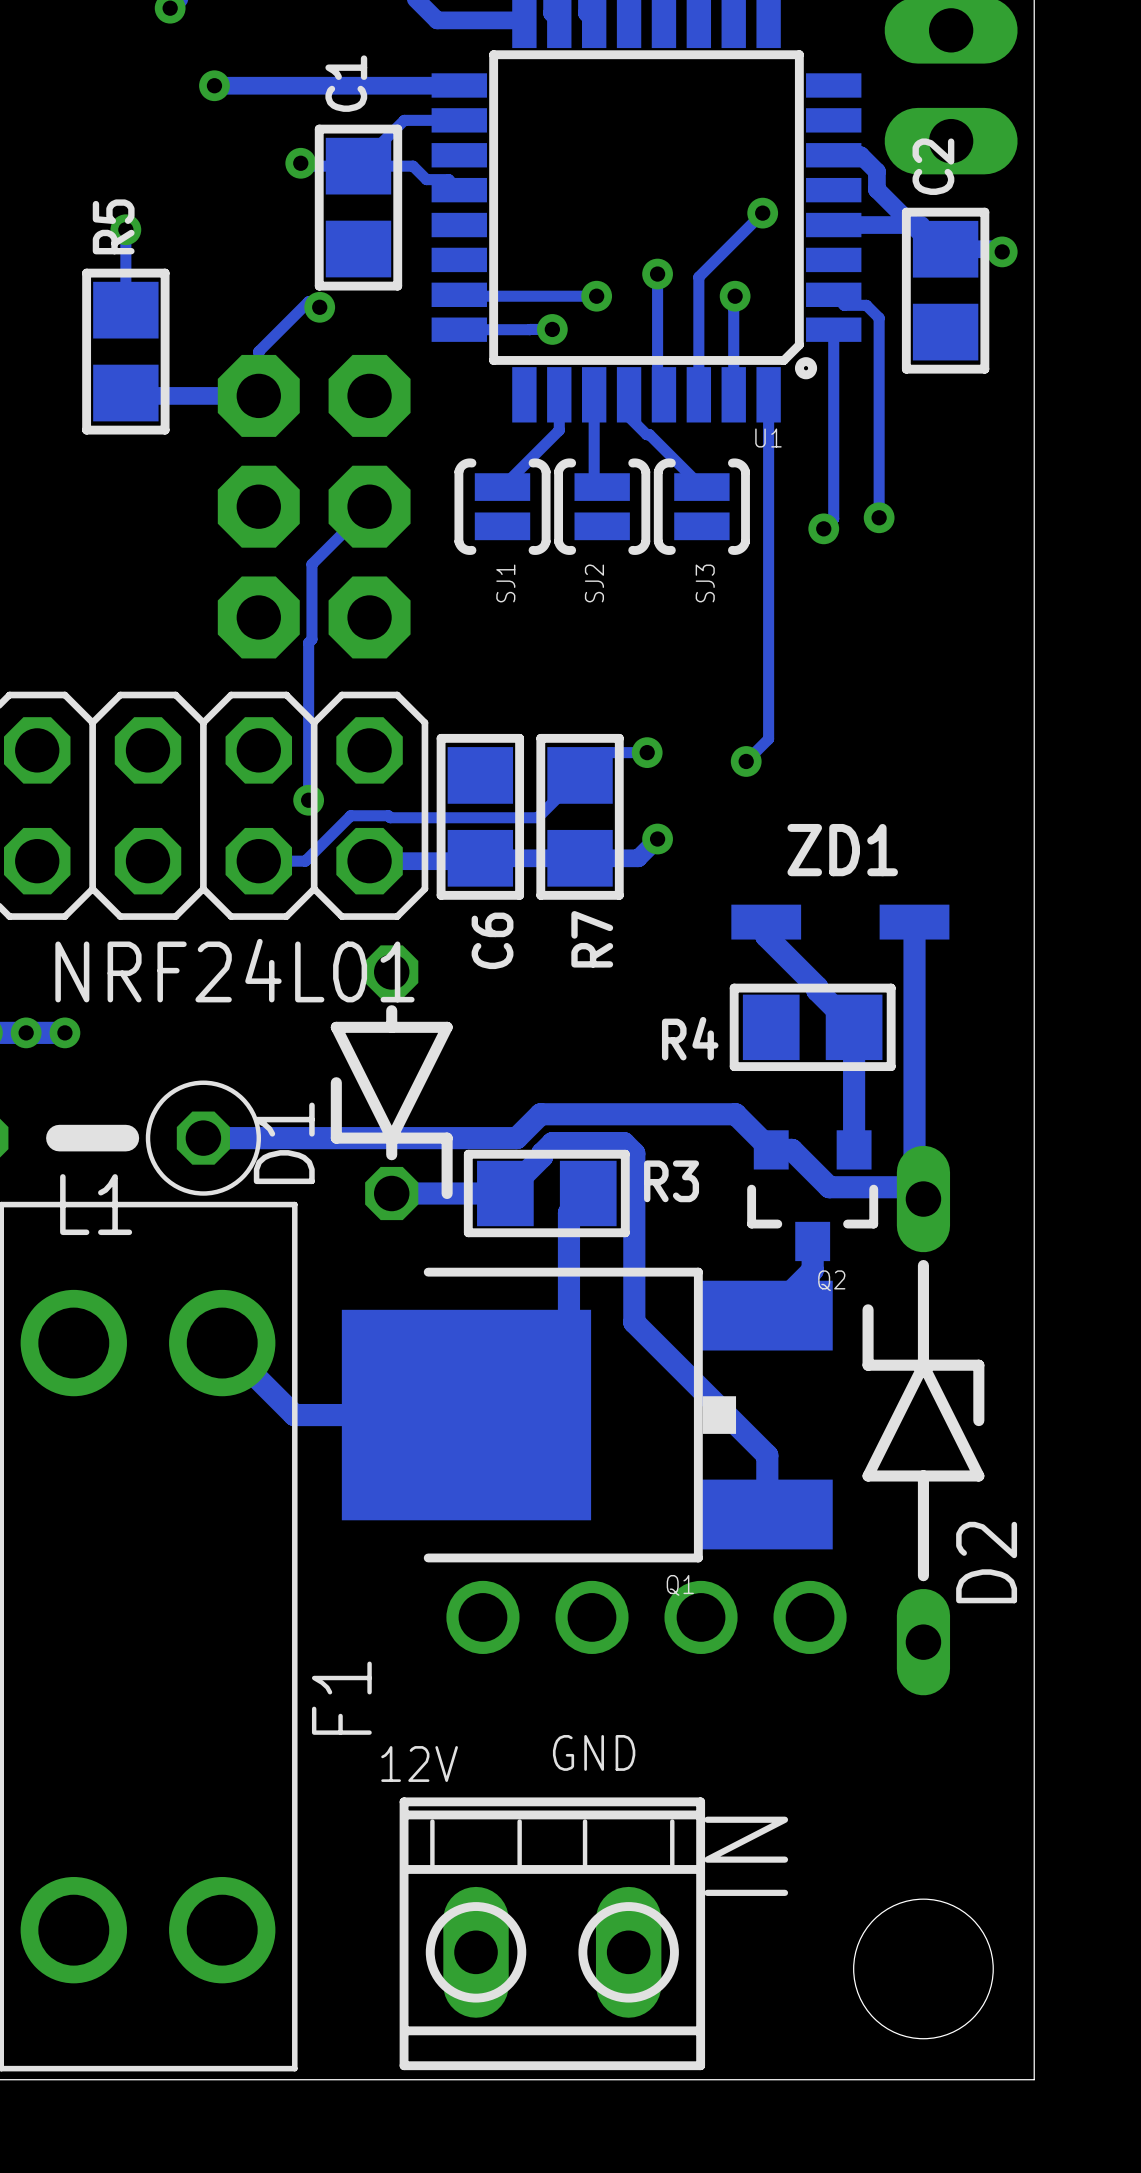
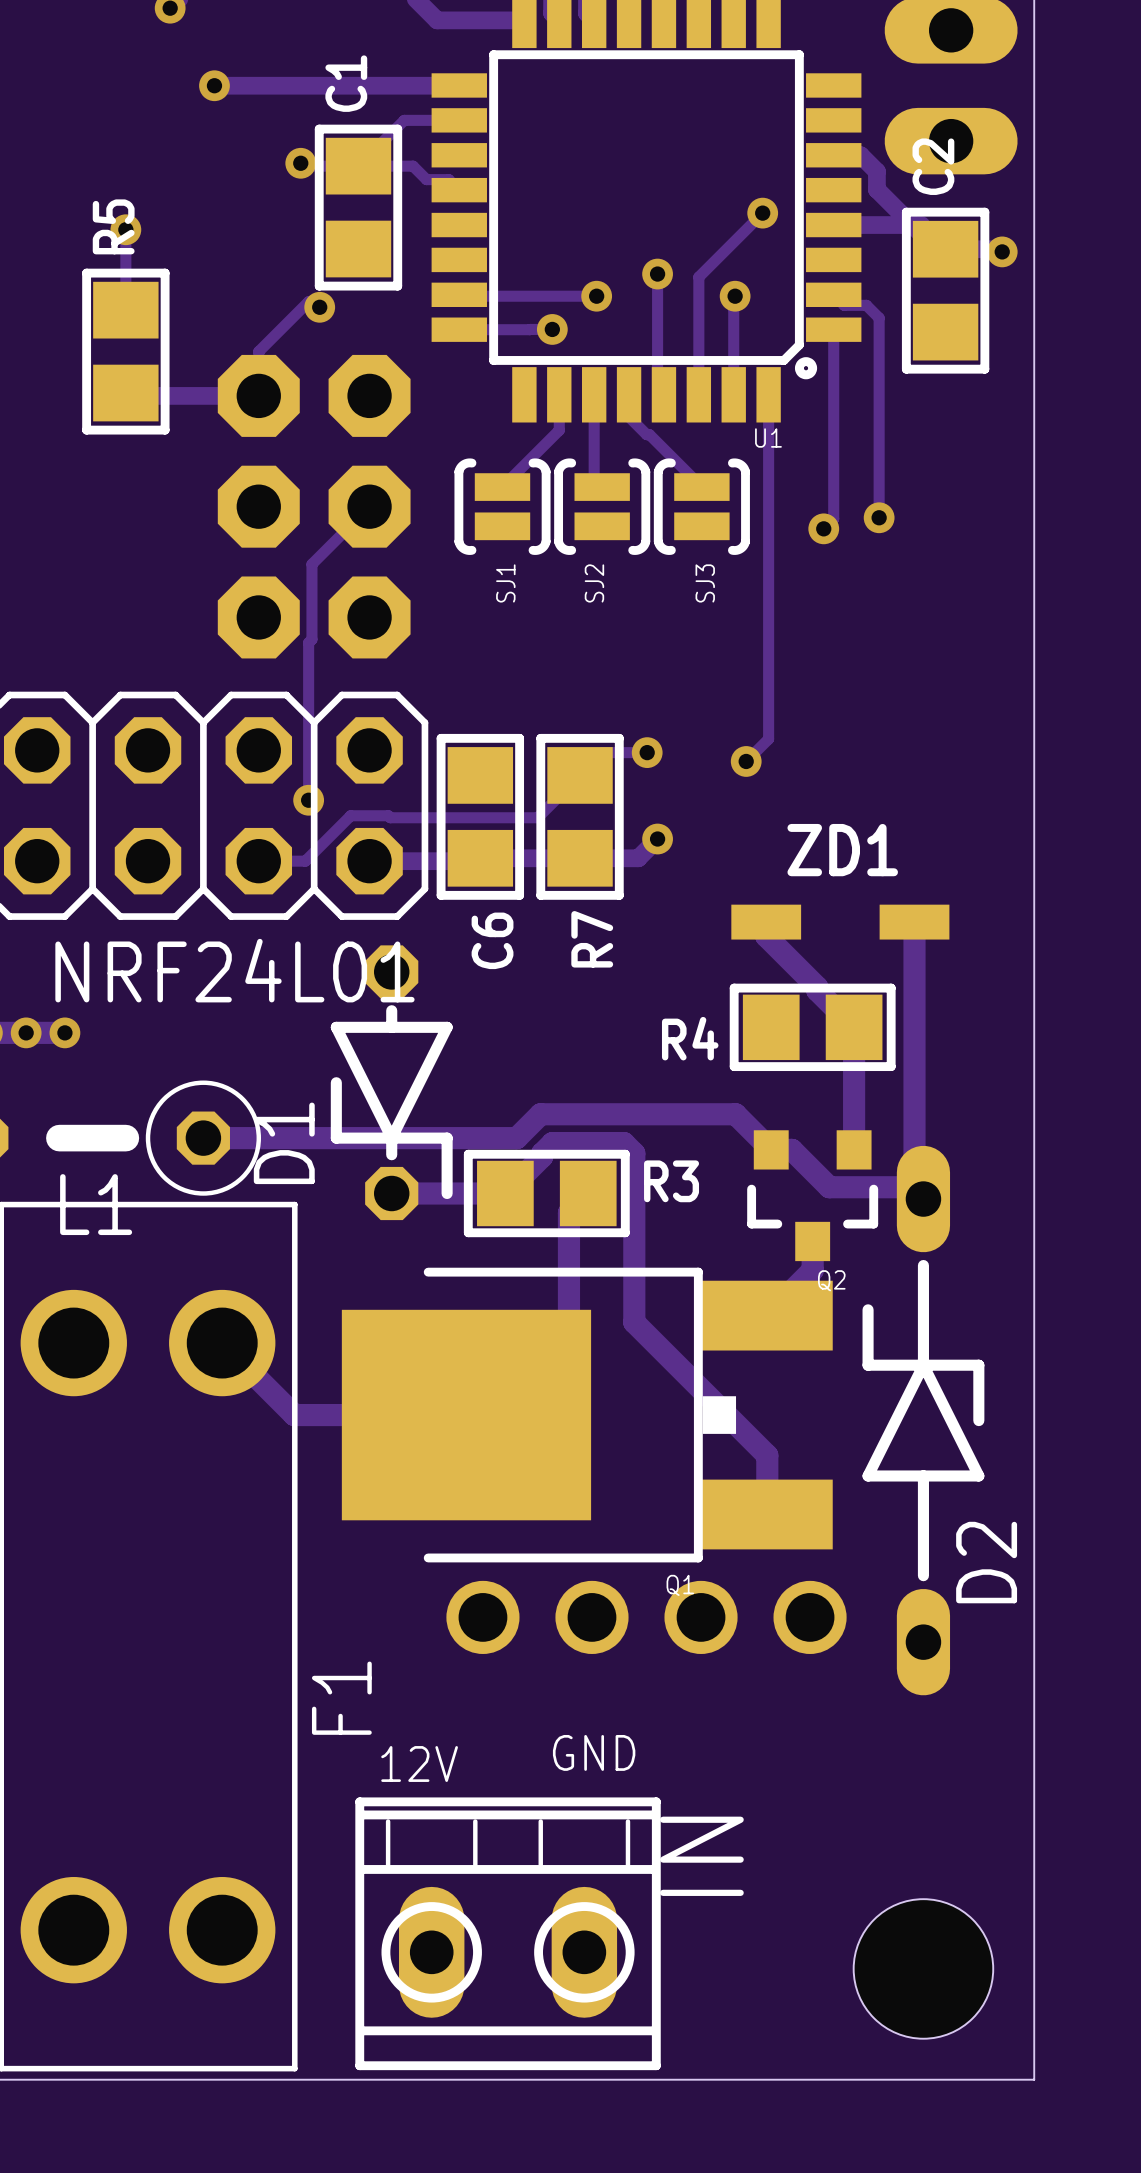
IN position: (552, 1933) -> (508, 1933)

